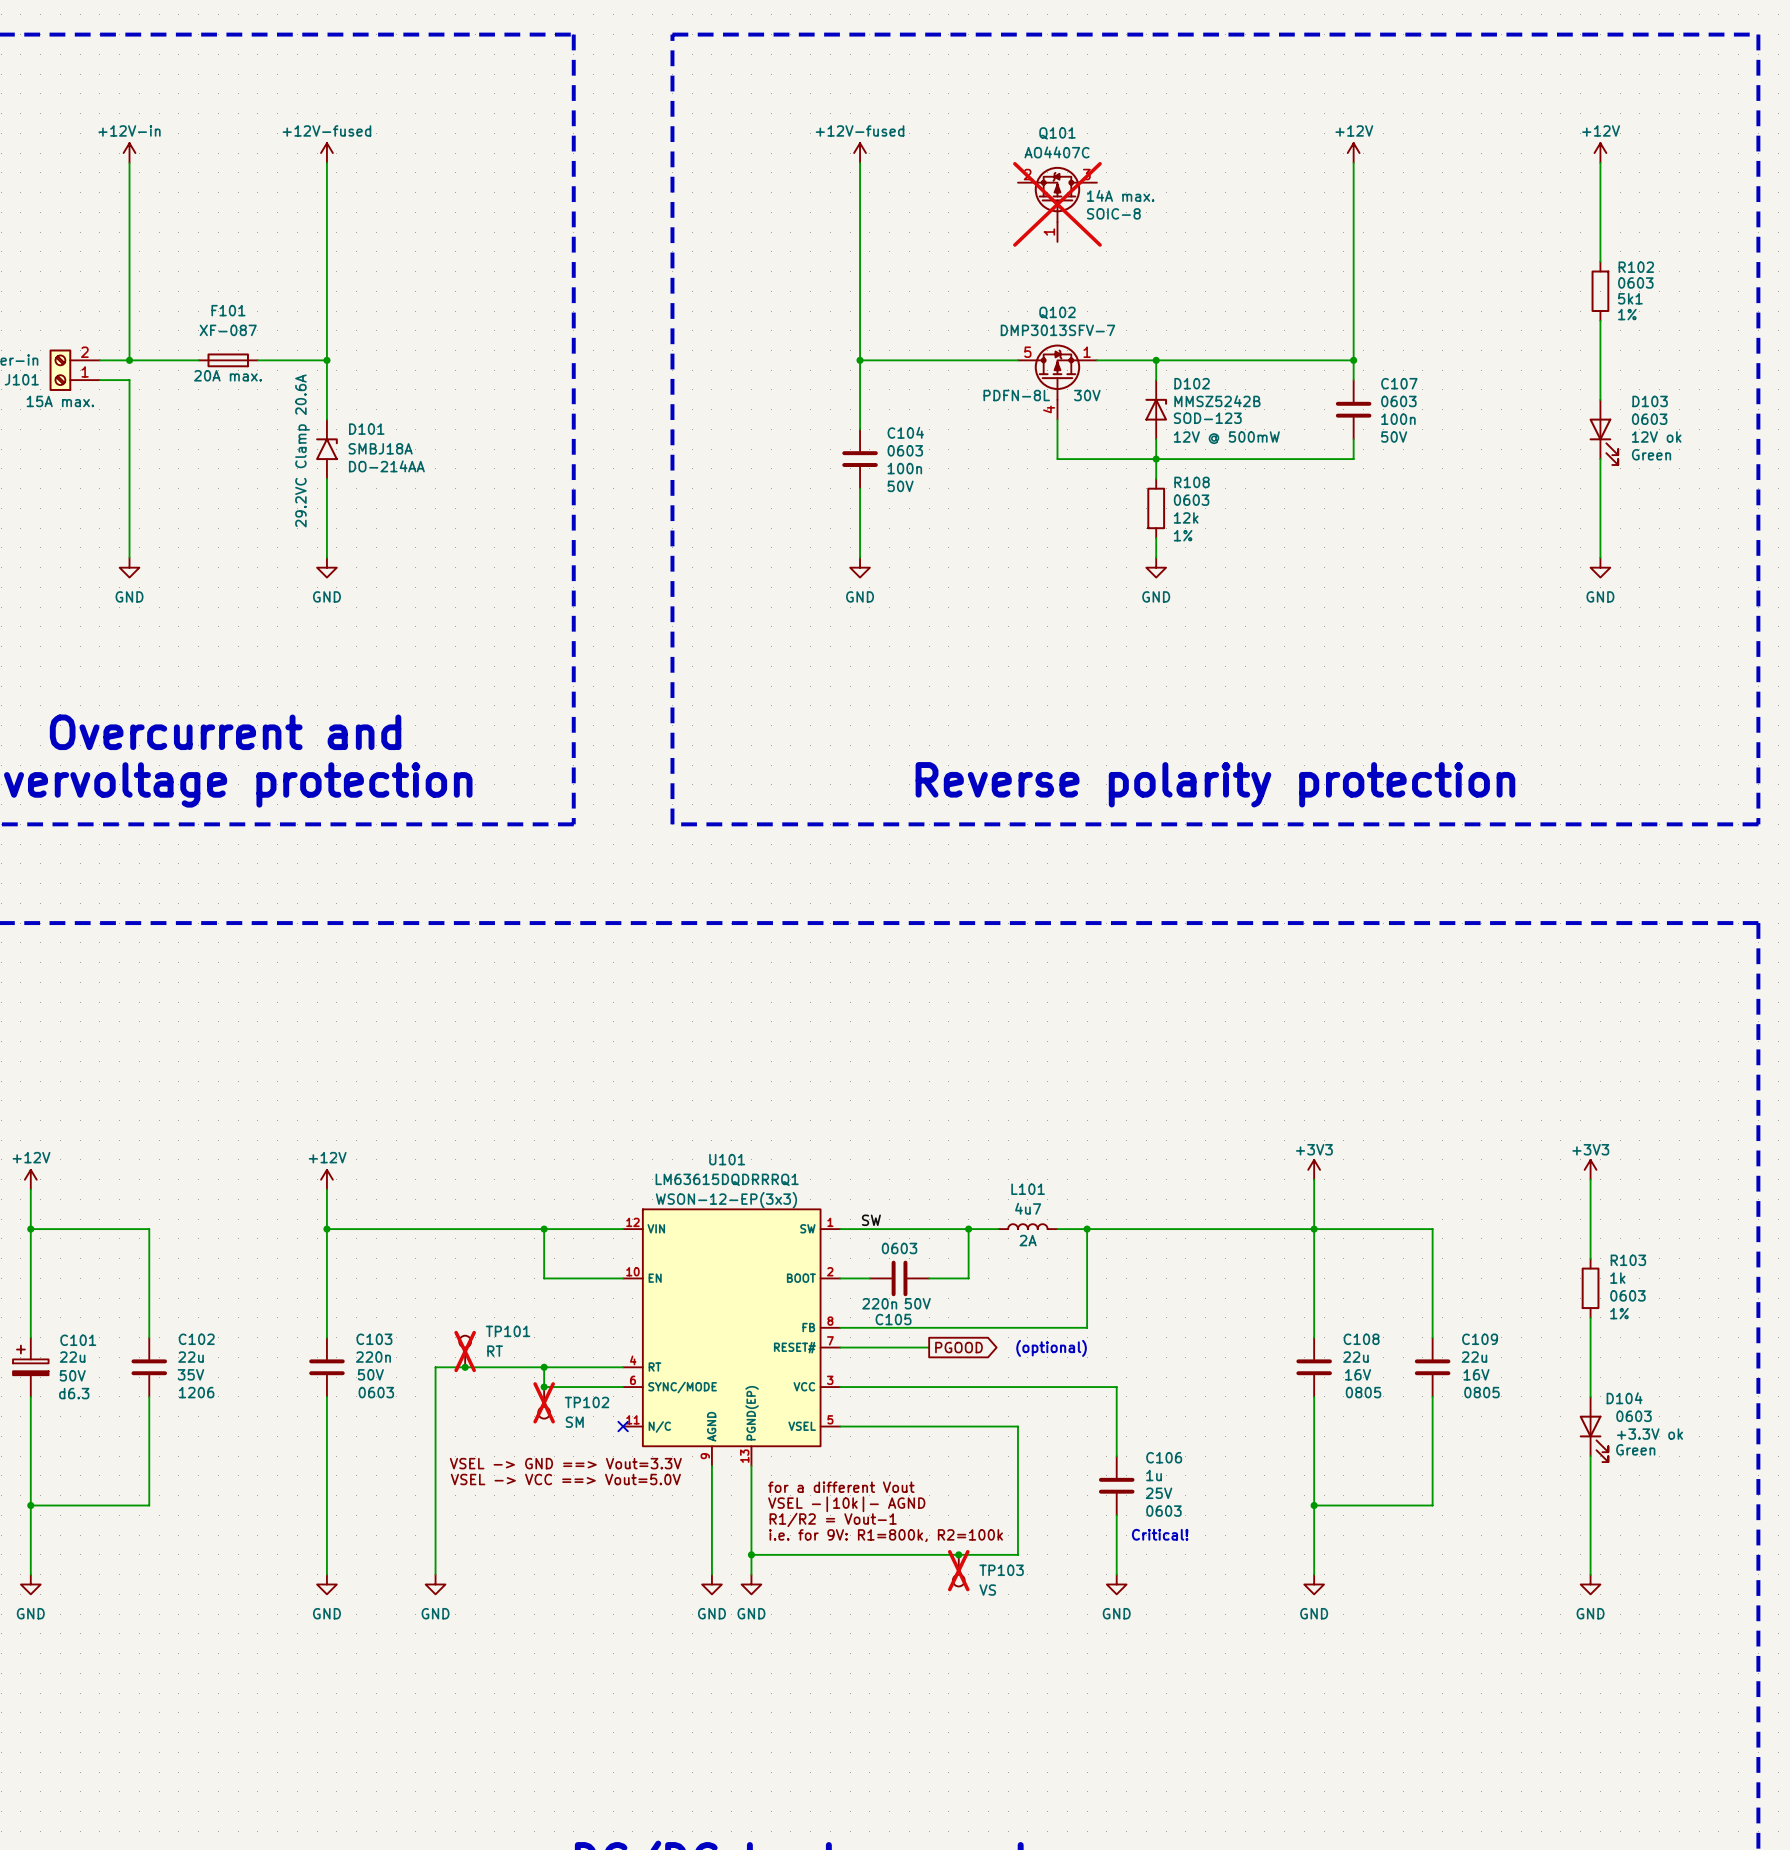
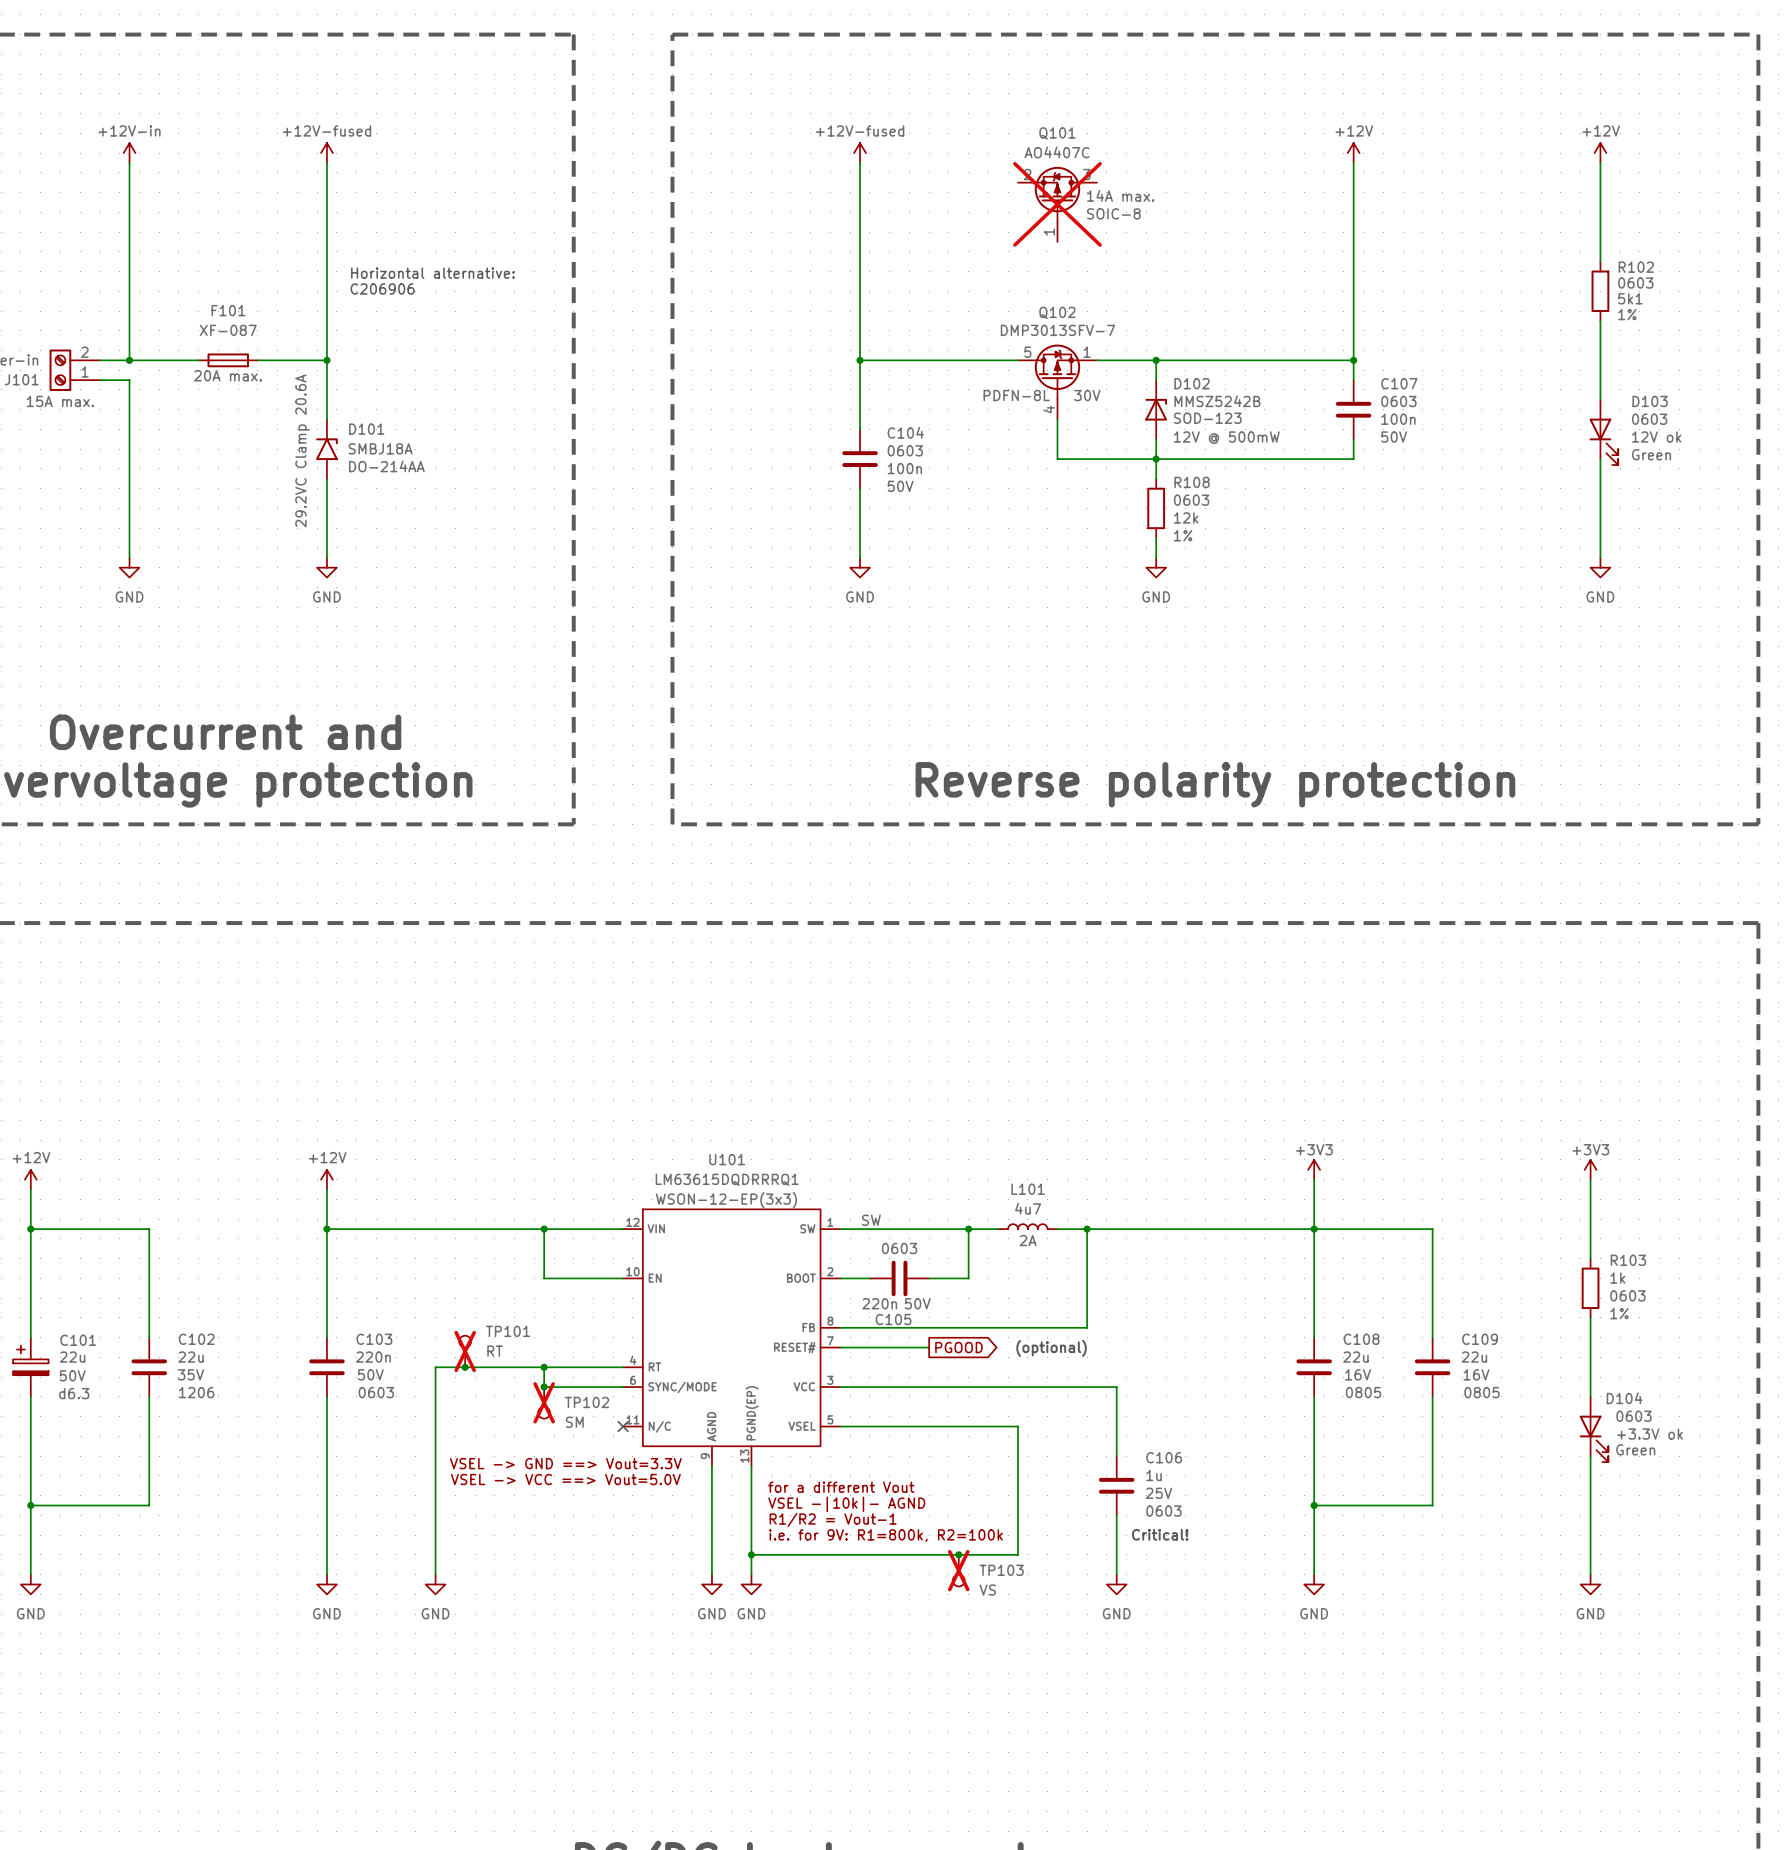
text: none -> Horizontal alternative: (432, 273)
text: none -> C206906 (382, 288)

